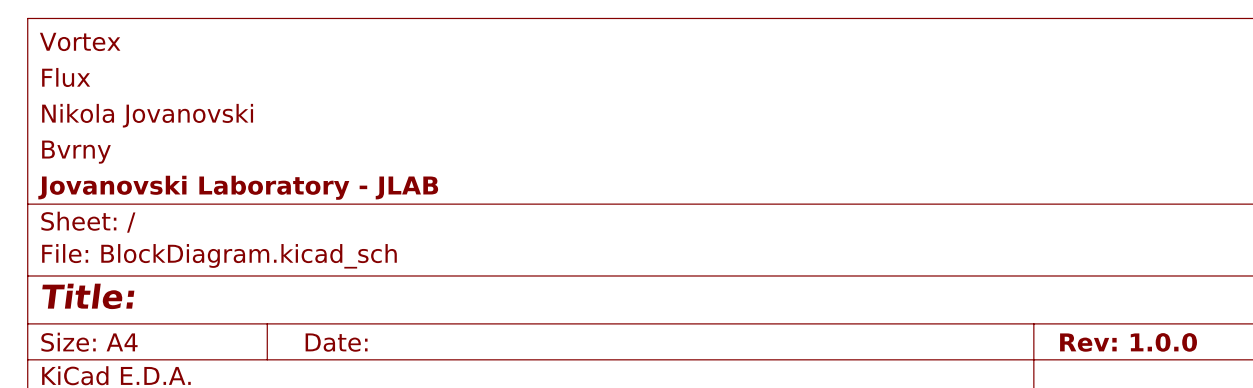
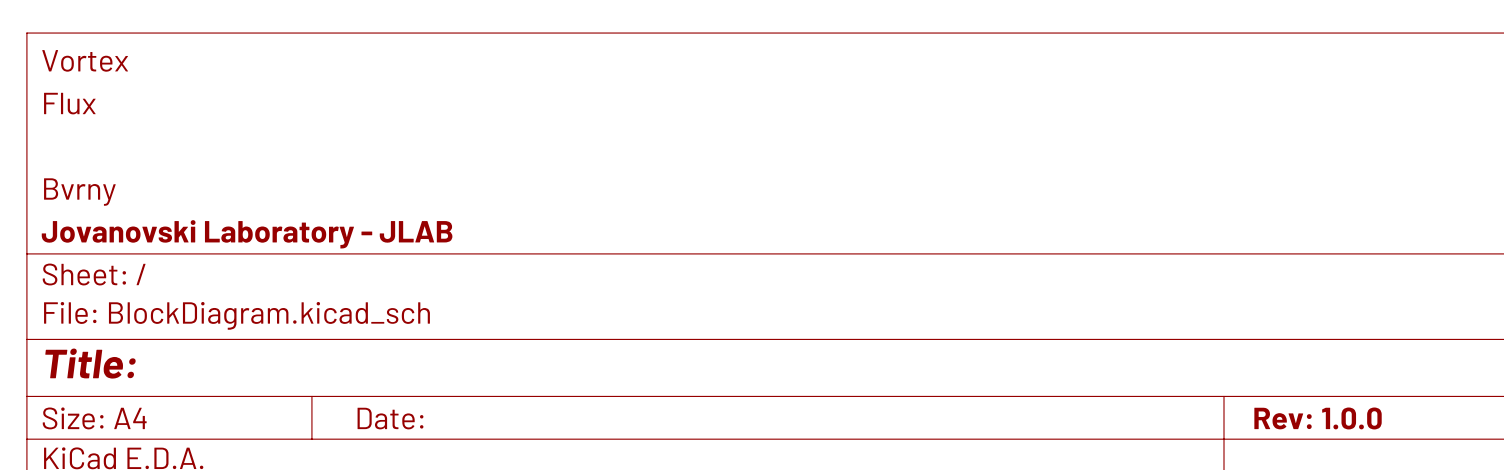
title block: Nikola Jovanovski (147, 115) -> none

